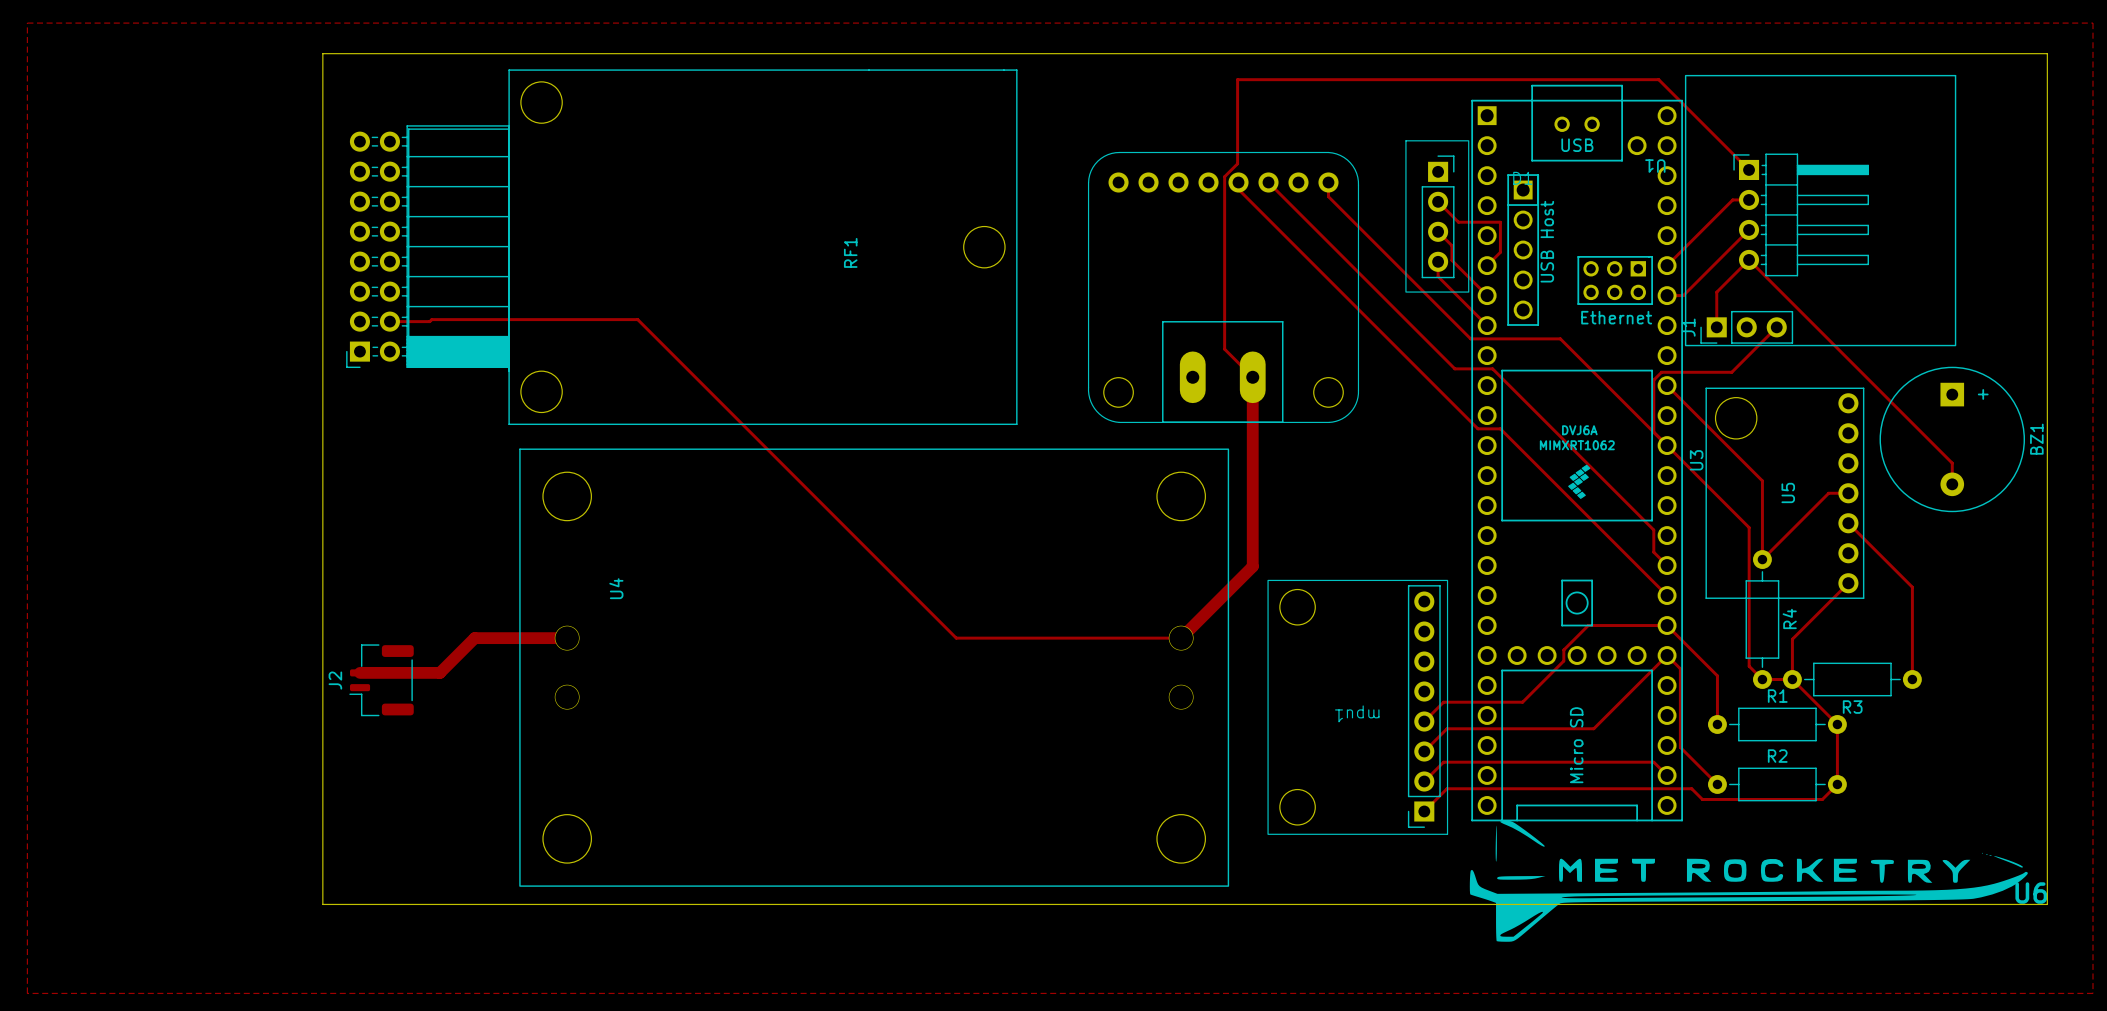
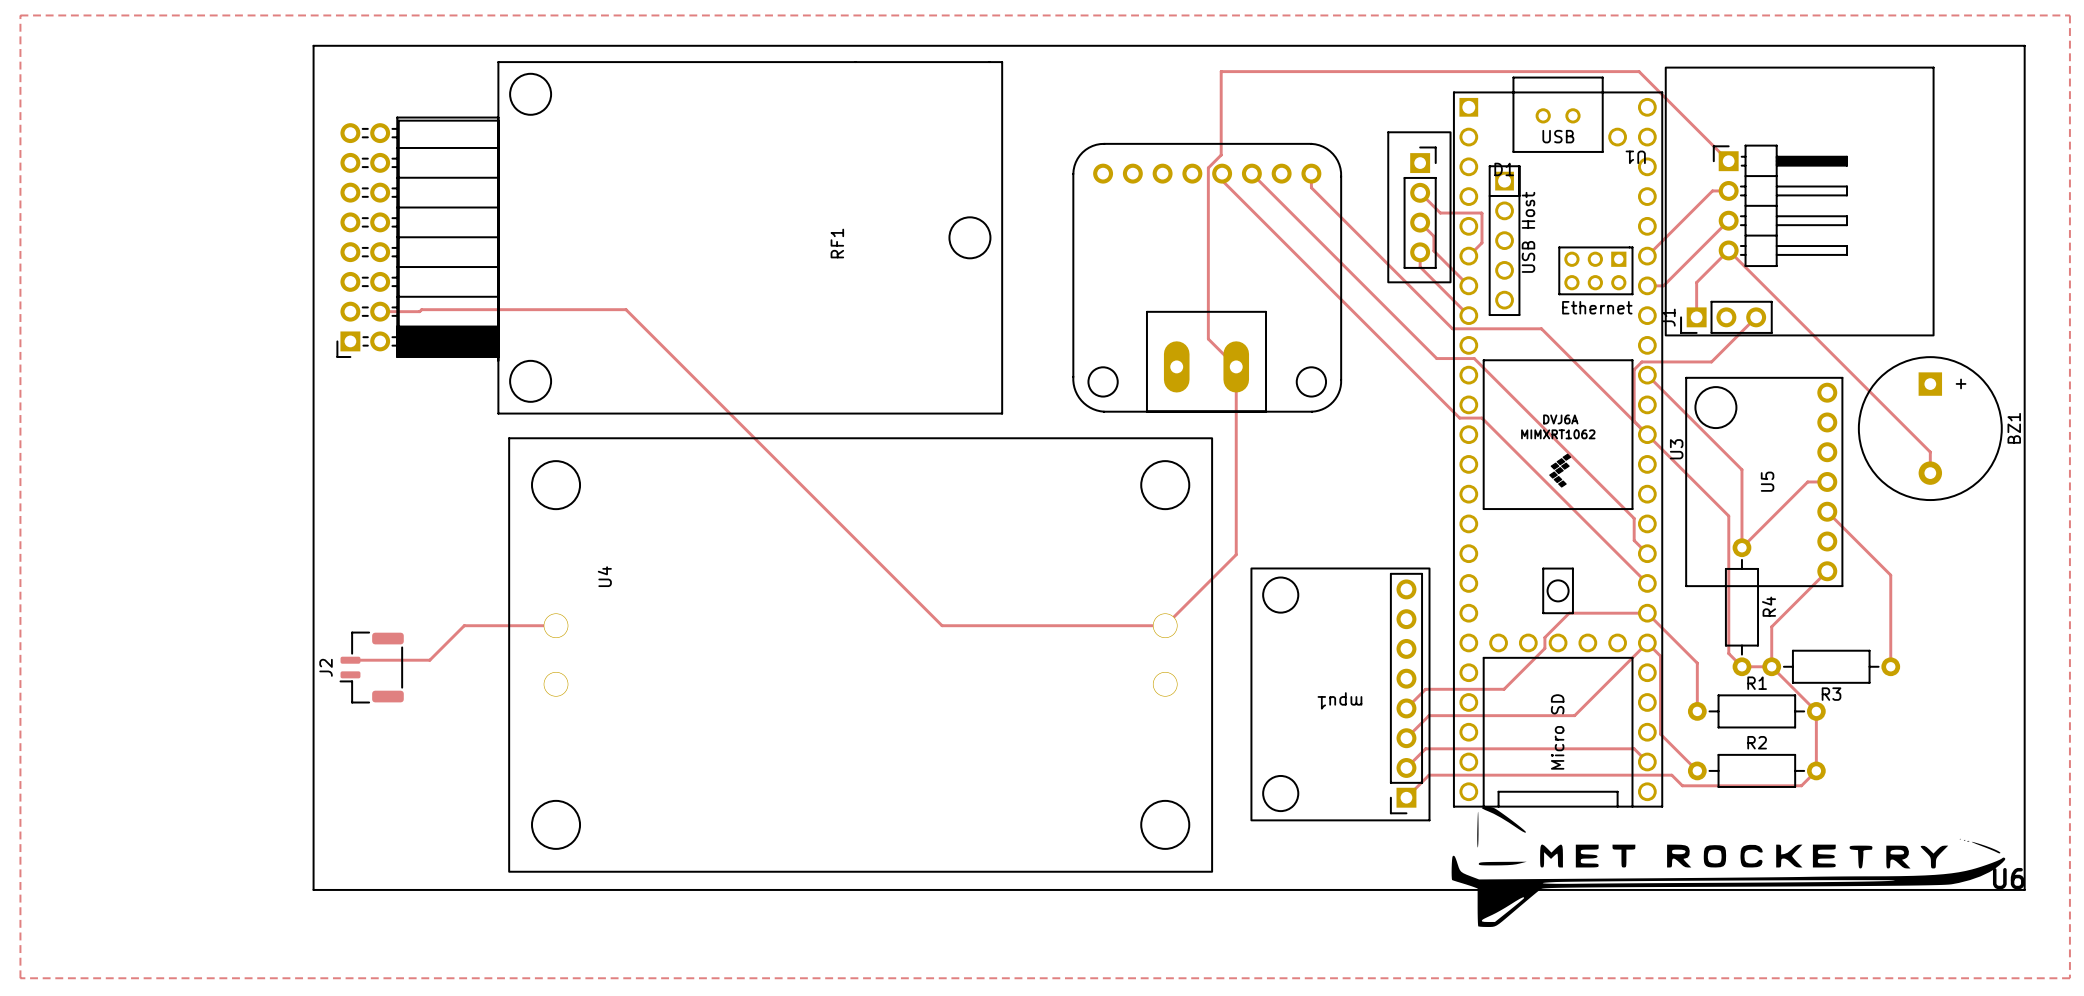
track width: thick (1252, 377) (1252, 566) (1181, 638) -> thin (1236, 366) (1236, 554) (1165, 625)
track width: thick (567, 638) (474, 638) (439, 672) (360, 672) -> thin (556, 625) (464, 625) (429, 660) (350, 660)

